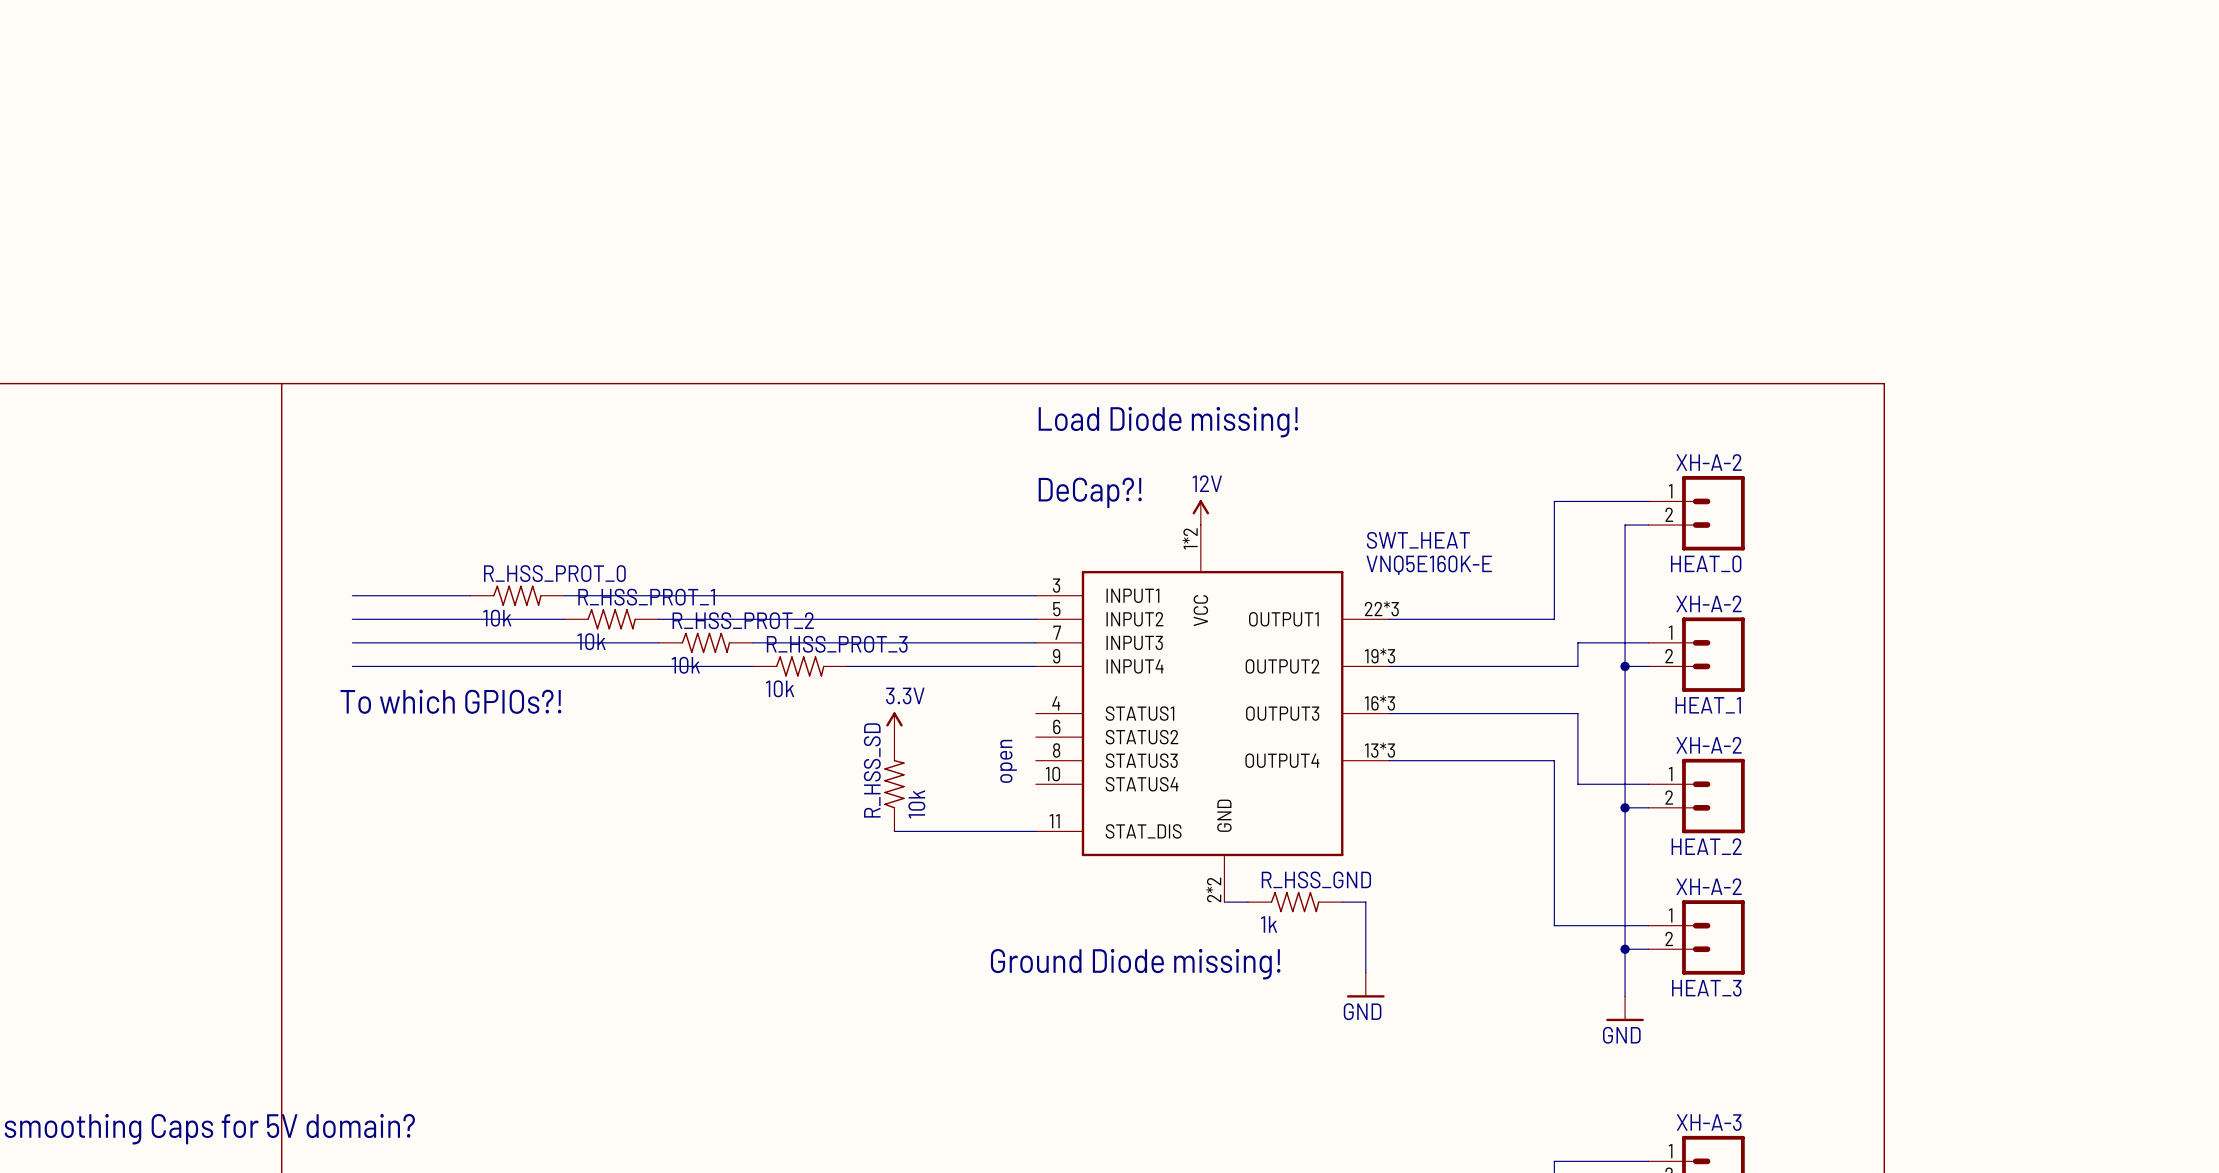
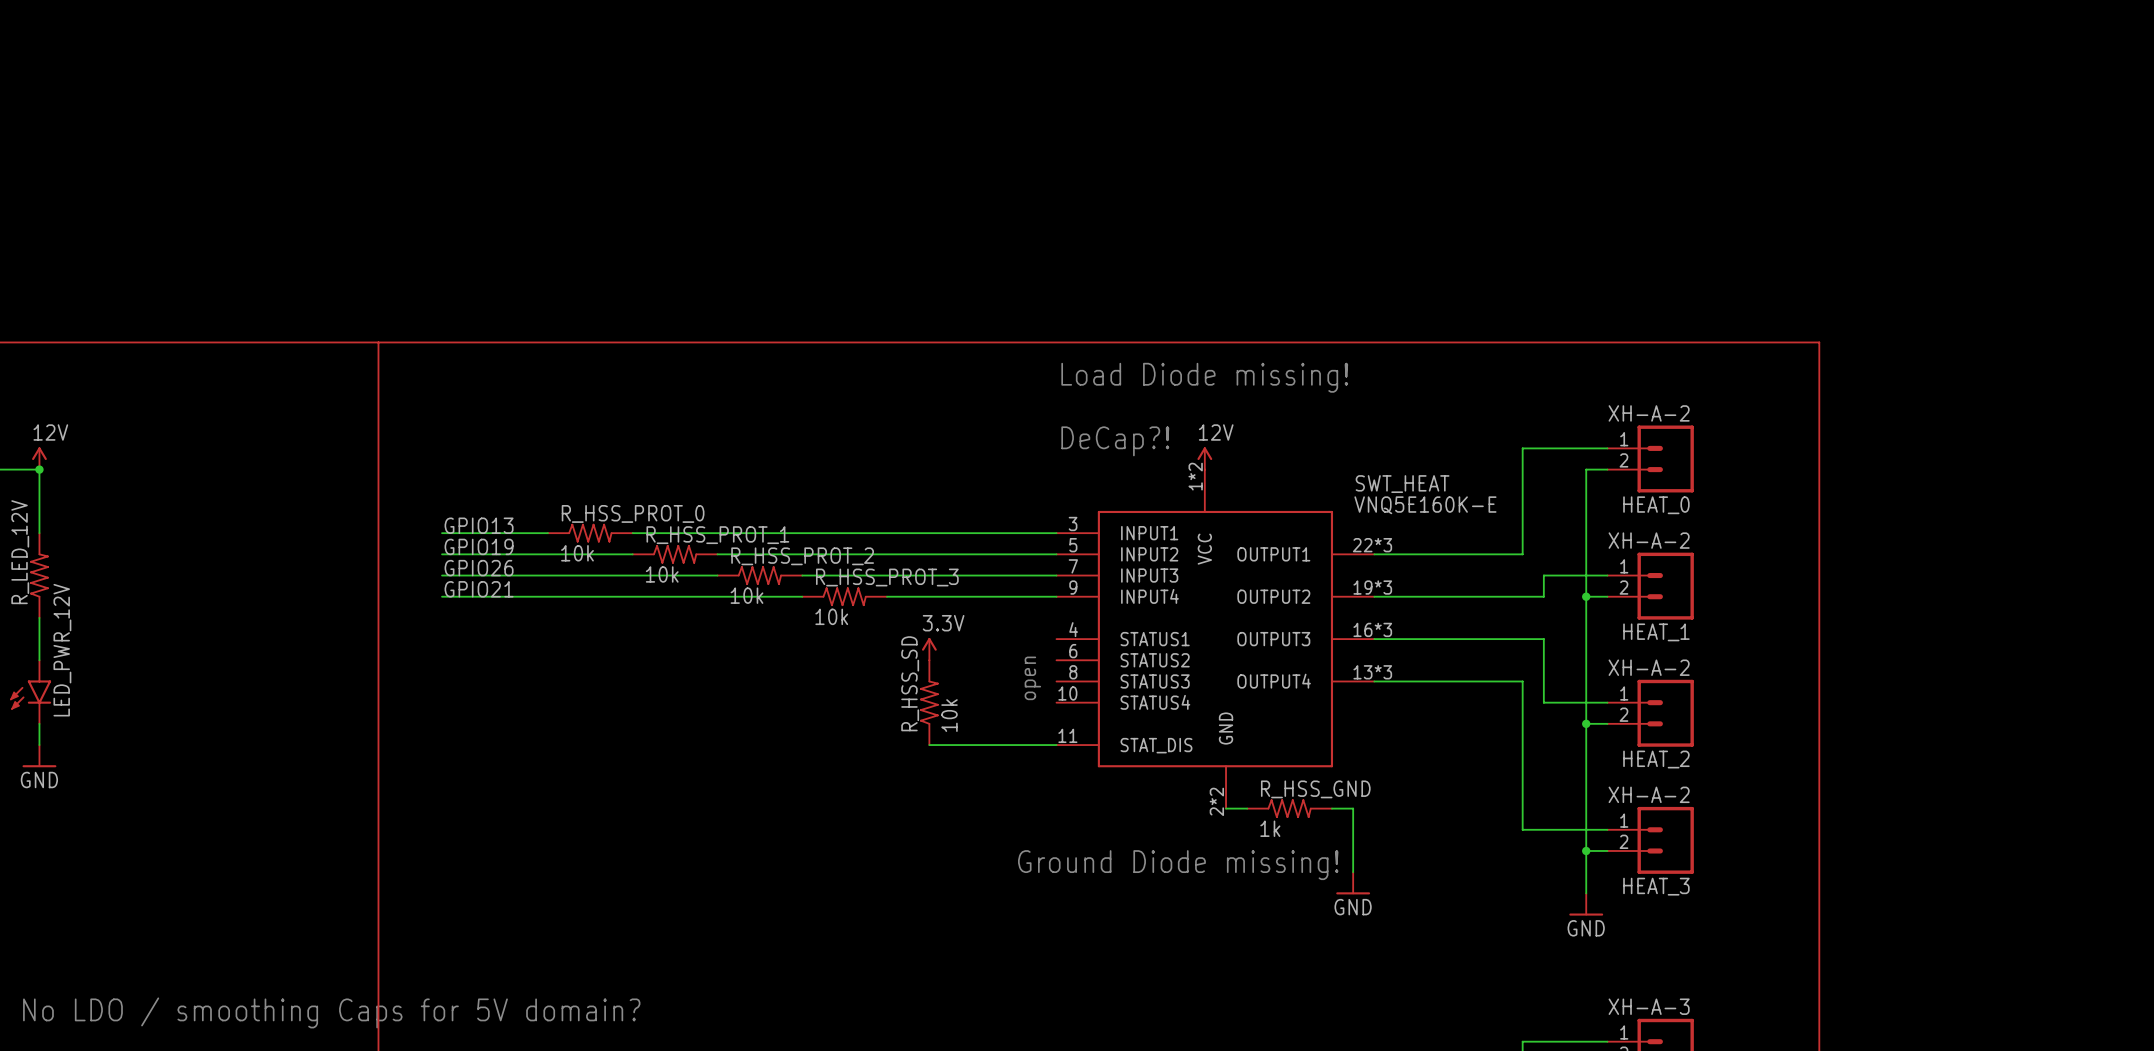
label: none -> GPIO13 (479, 525)
label: none -> GPIO19 (479, 546)
label: none -> GPIO26 (479, 568)
label: none -> GPIO21 (479, 589)
text: To which GPIOs?! (450, 701) -> none

